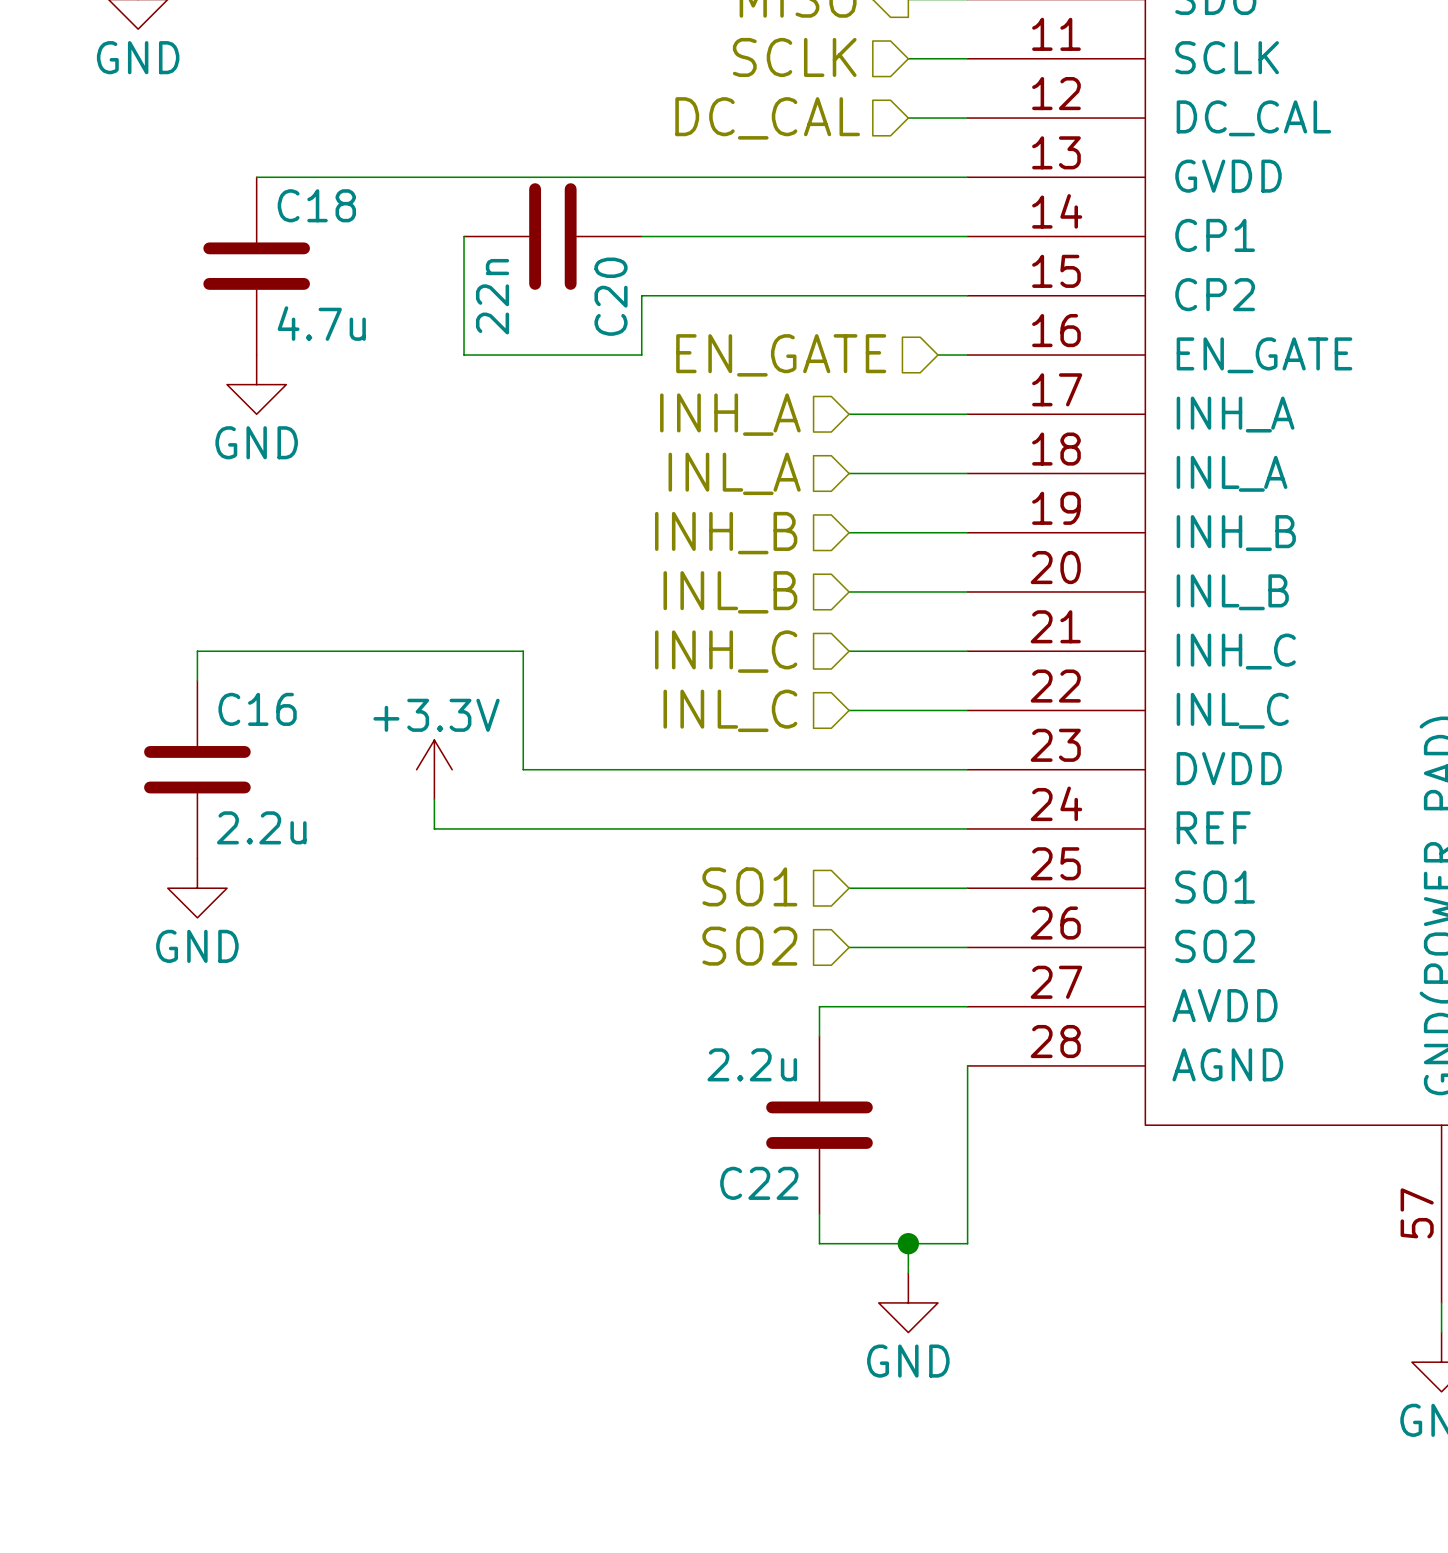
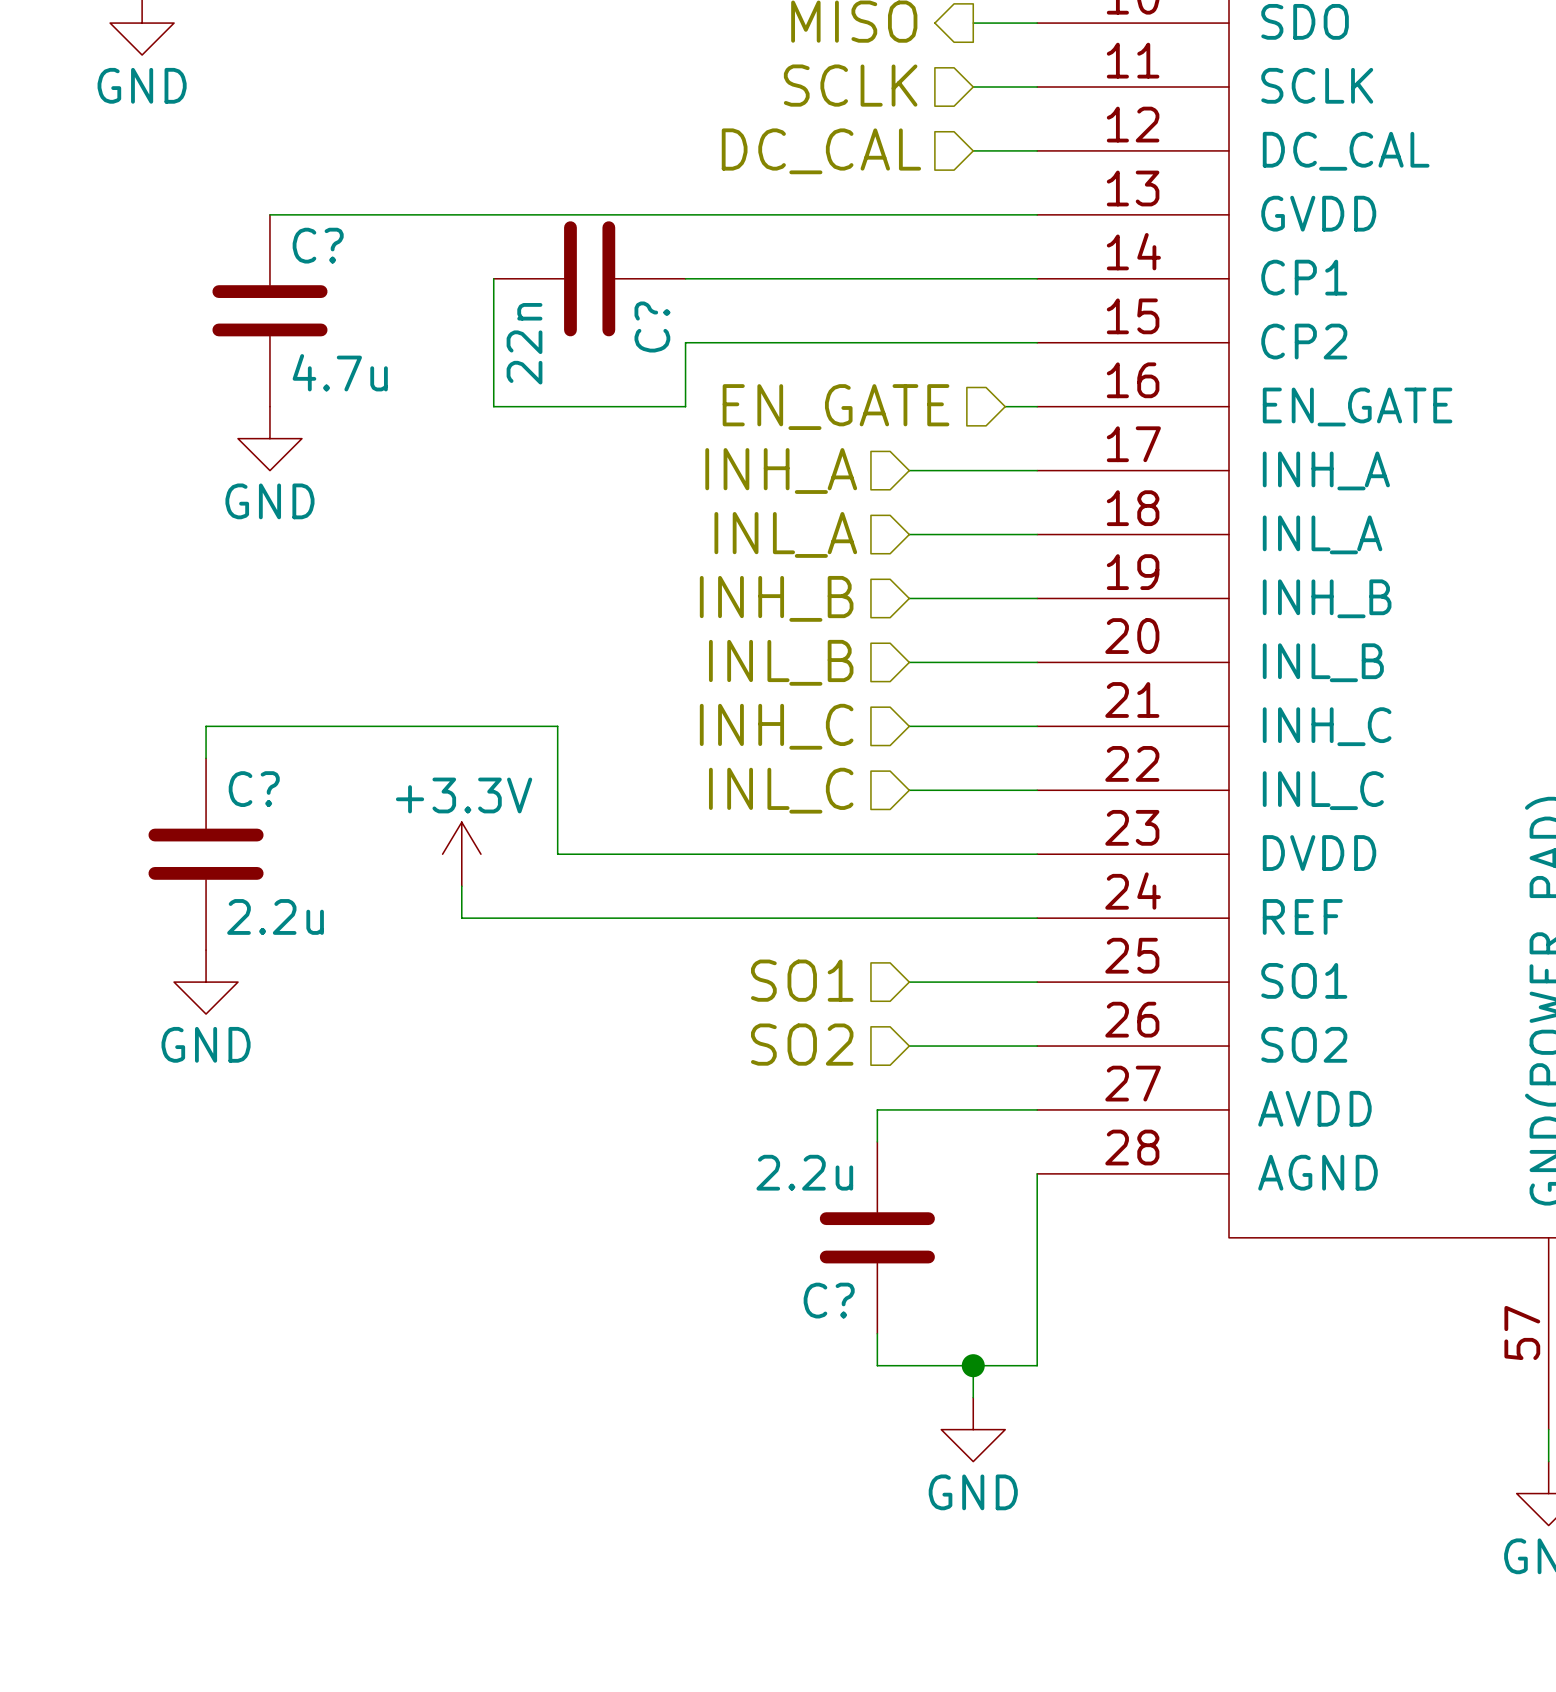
C18 name: C18 (316, 205) -> C? (318, 245)
C20 name: C20 (611, 296) -> C? (652, 326)
C16 name: C16 (257, 709) -> C? (254, 789)
C22 name: C22 (759, 1183) -> C? (829, 1300)

